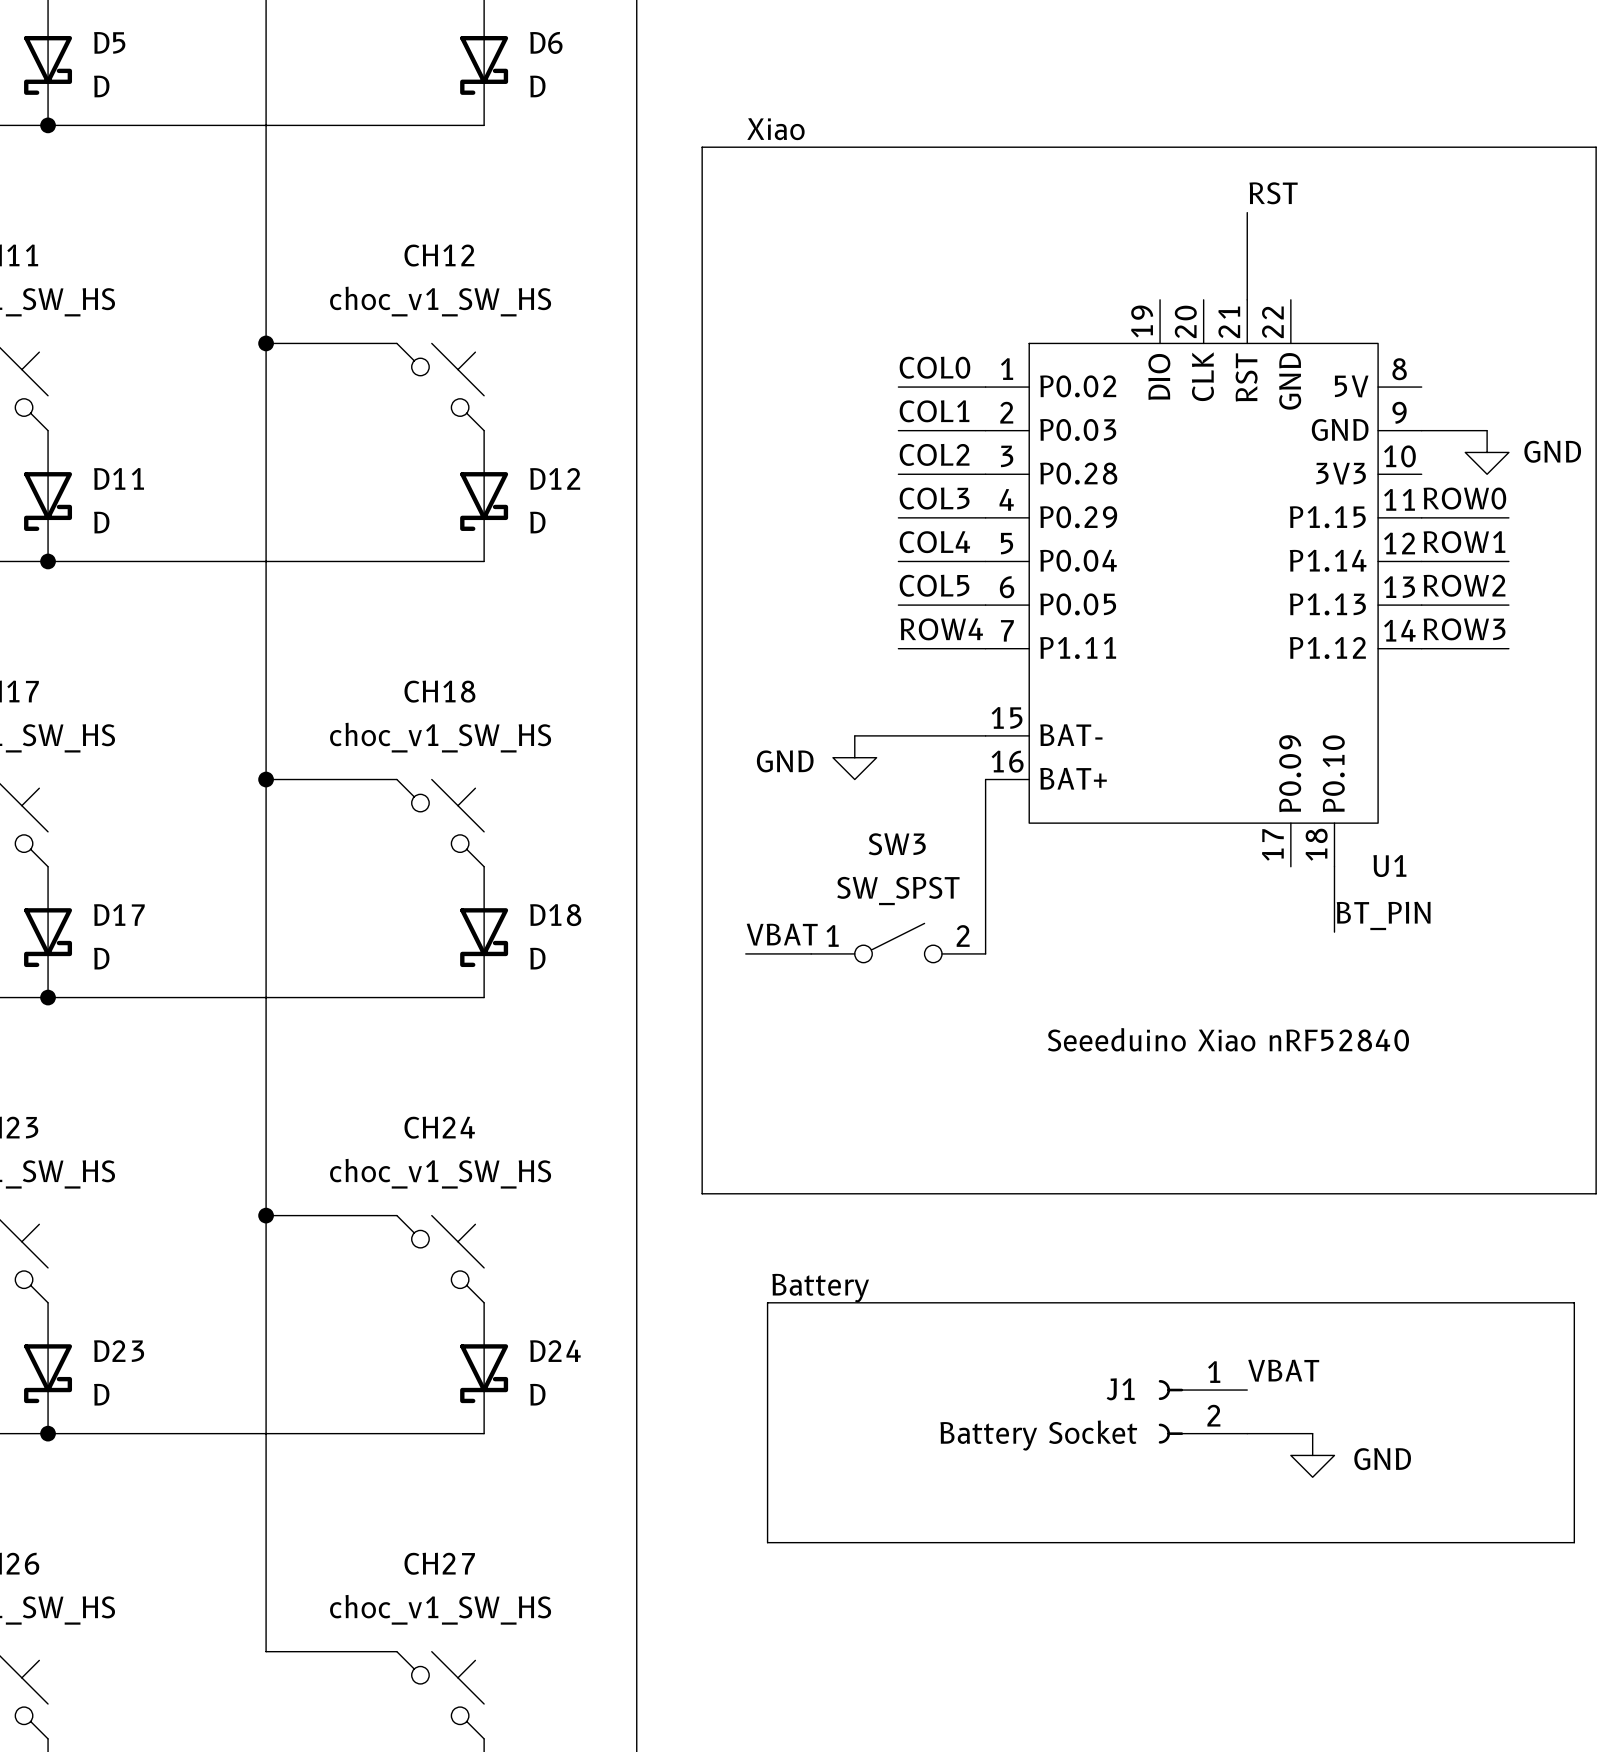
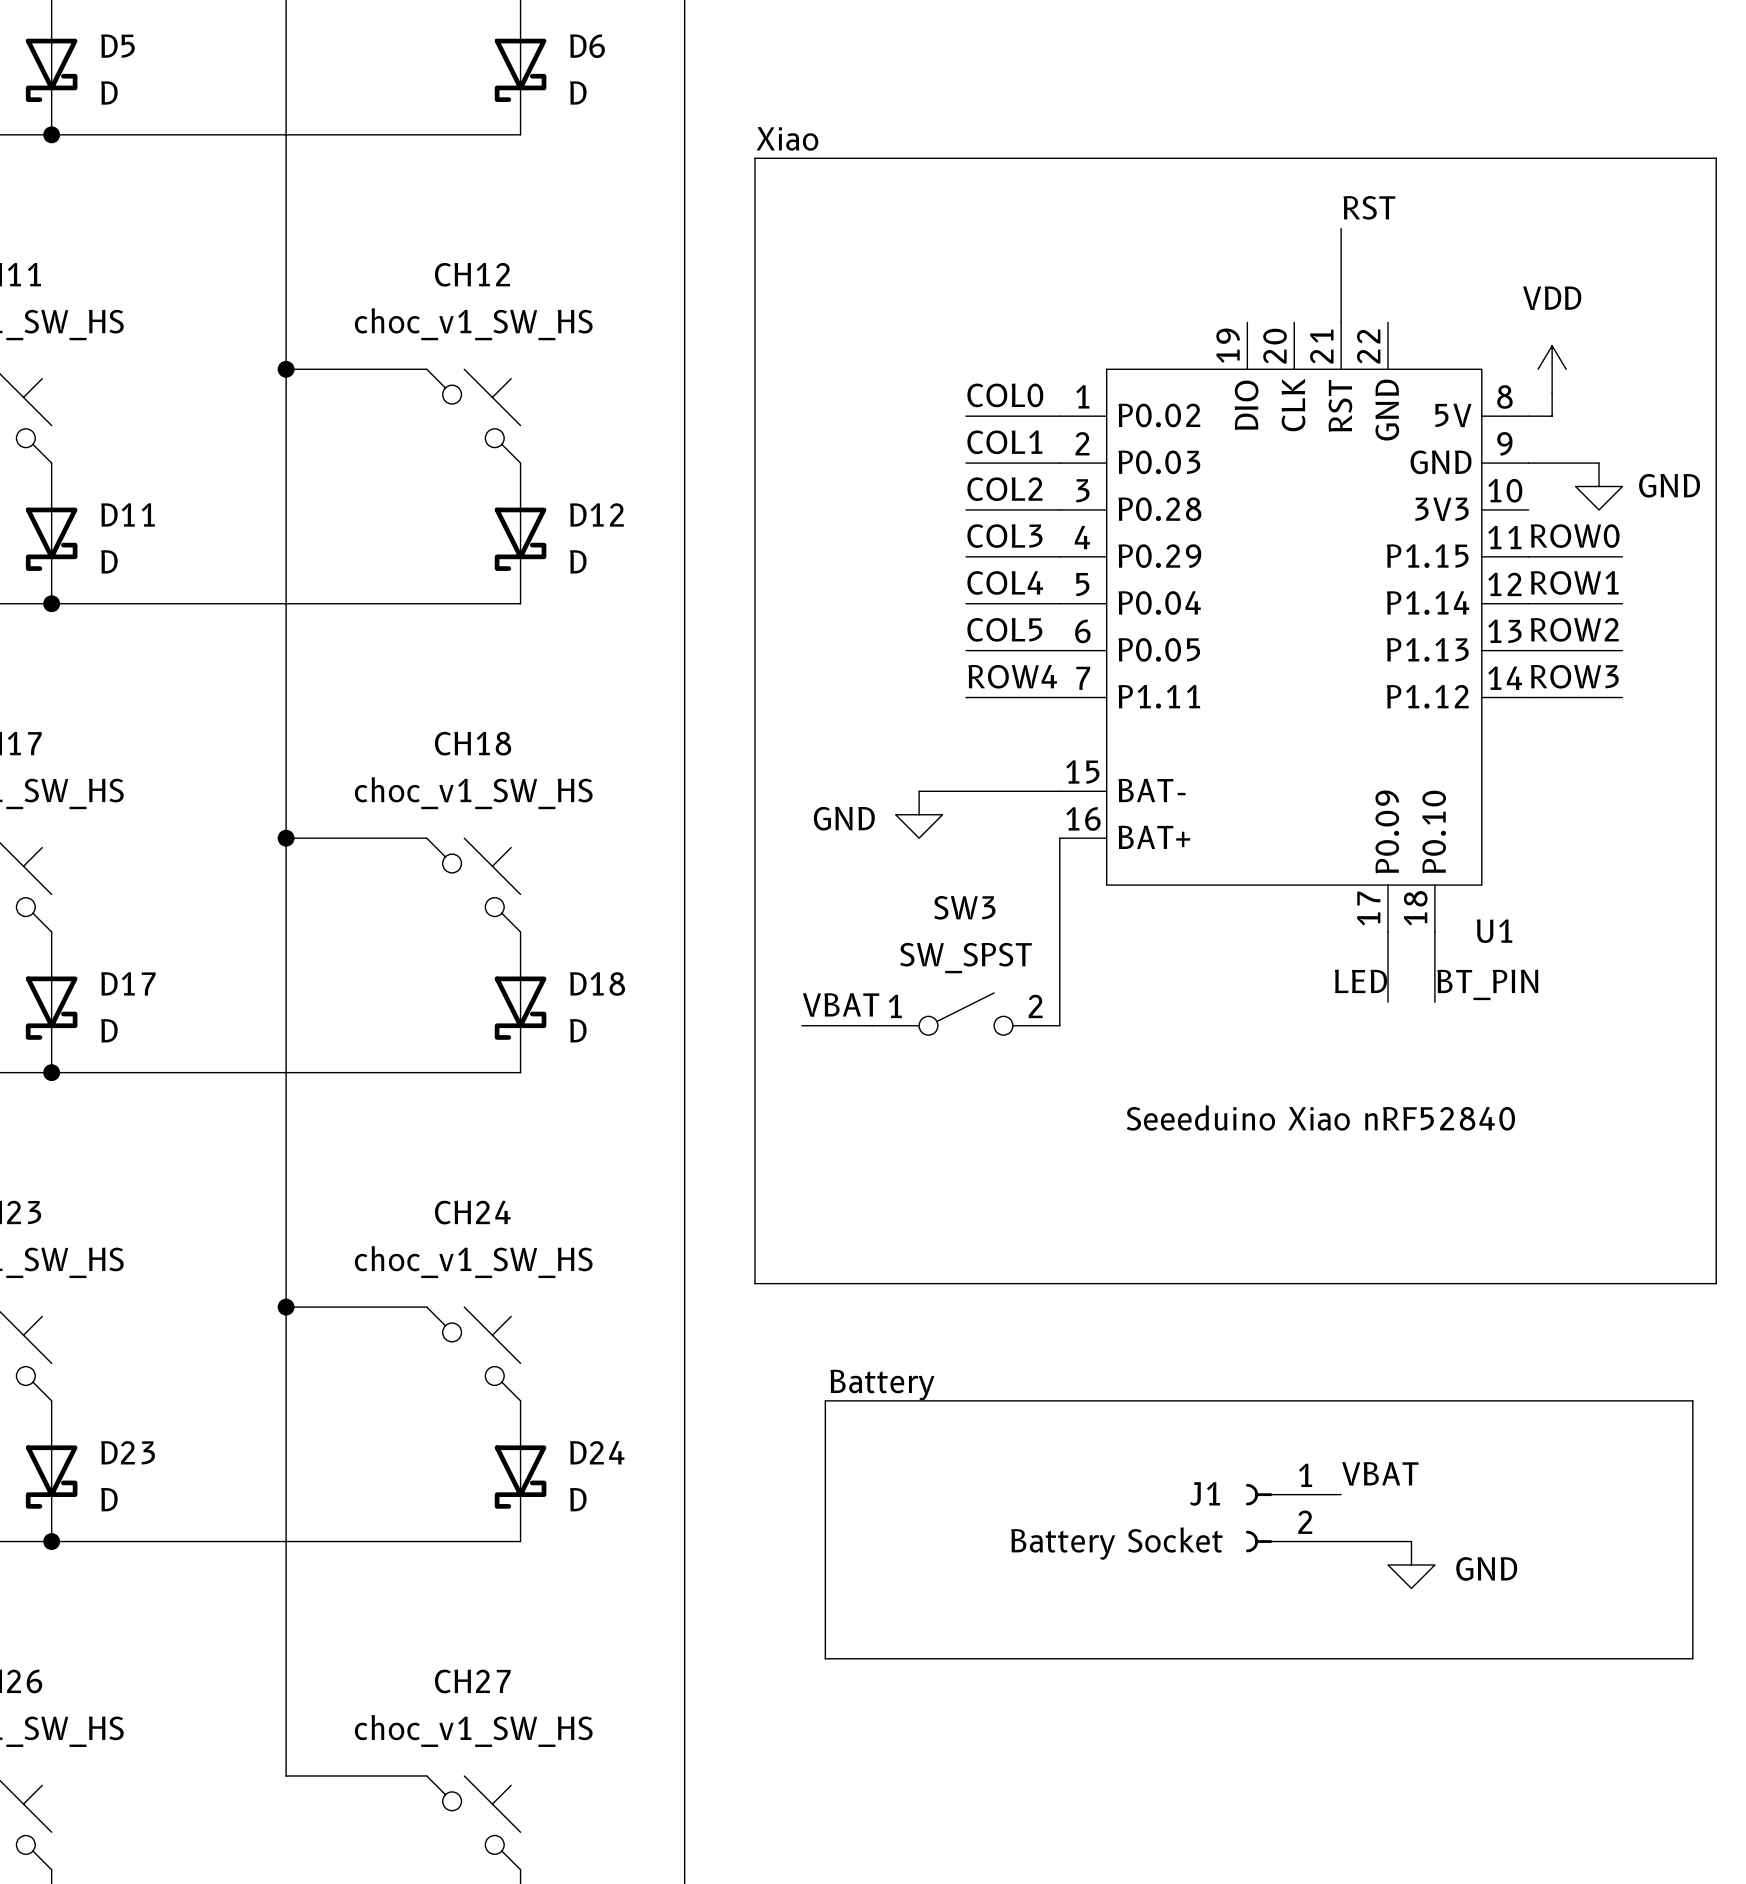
text position: Xiao (775, 129) -> Xiao (787, 138)
power symbol: none -> VDD (1552, 369)
wire: none -> (1552, 392) (1552, 416) (1528, 416)
wire: none -> (1388, 931) (1388, 1002)
label: none -> LED (1361, 981)

